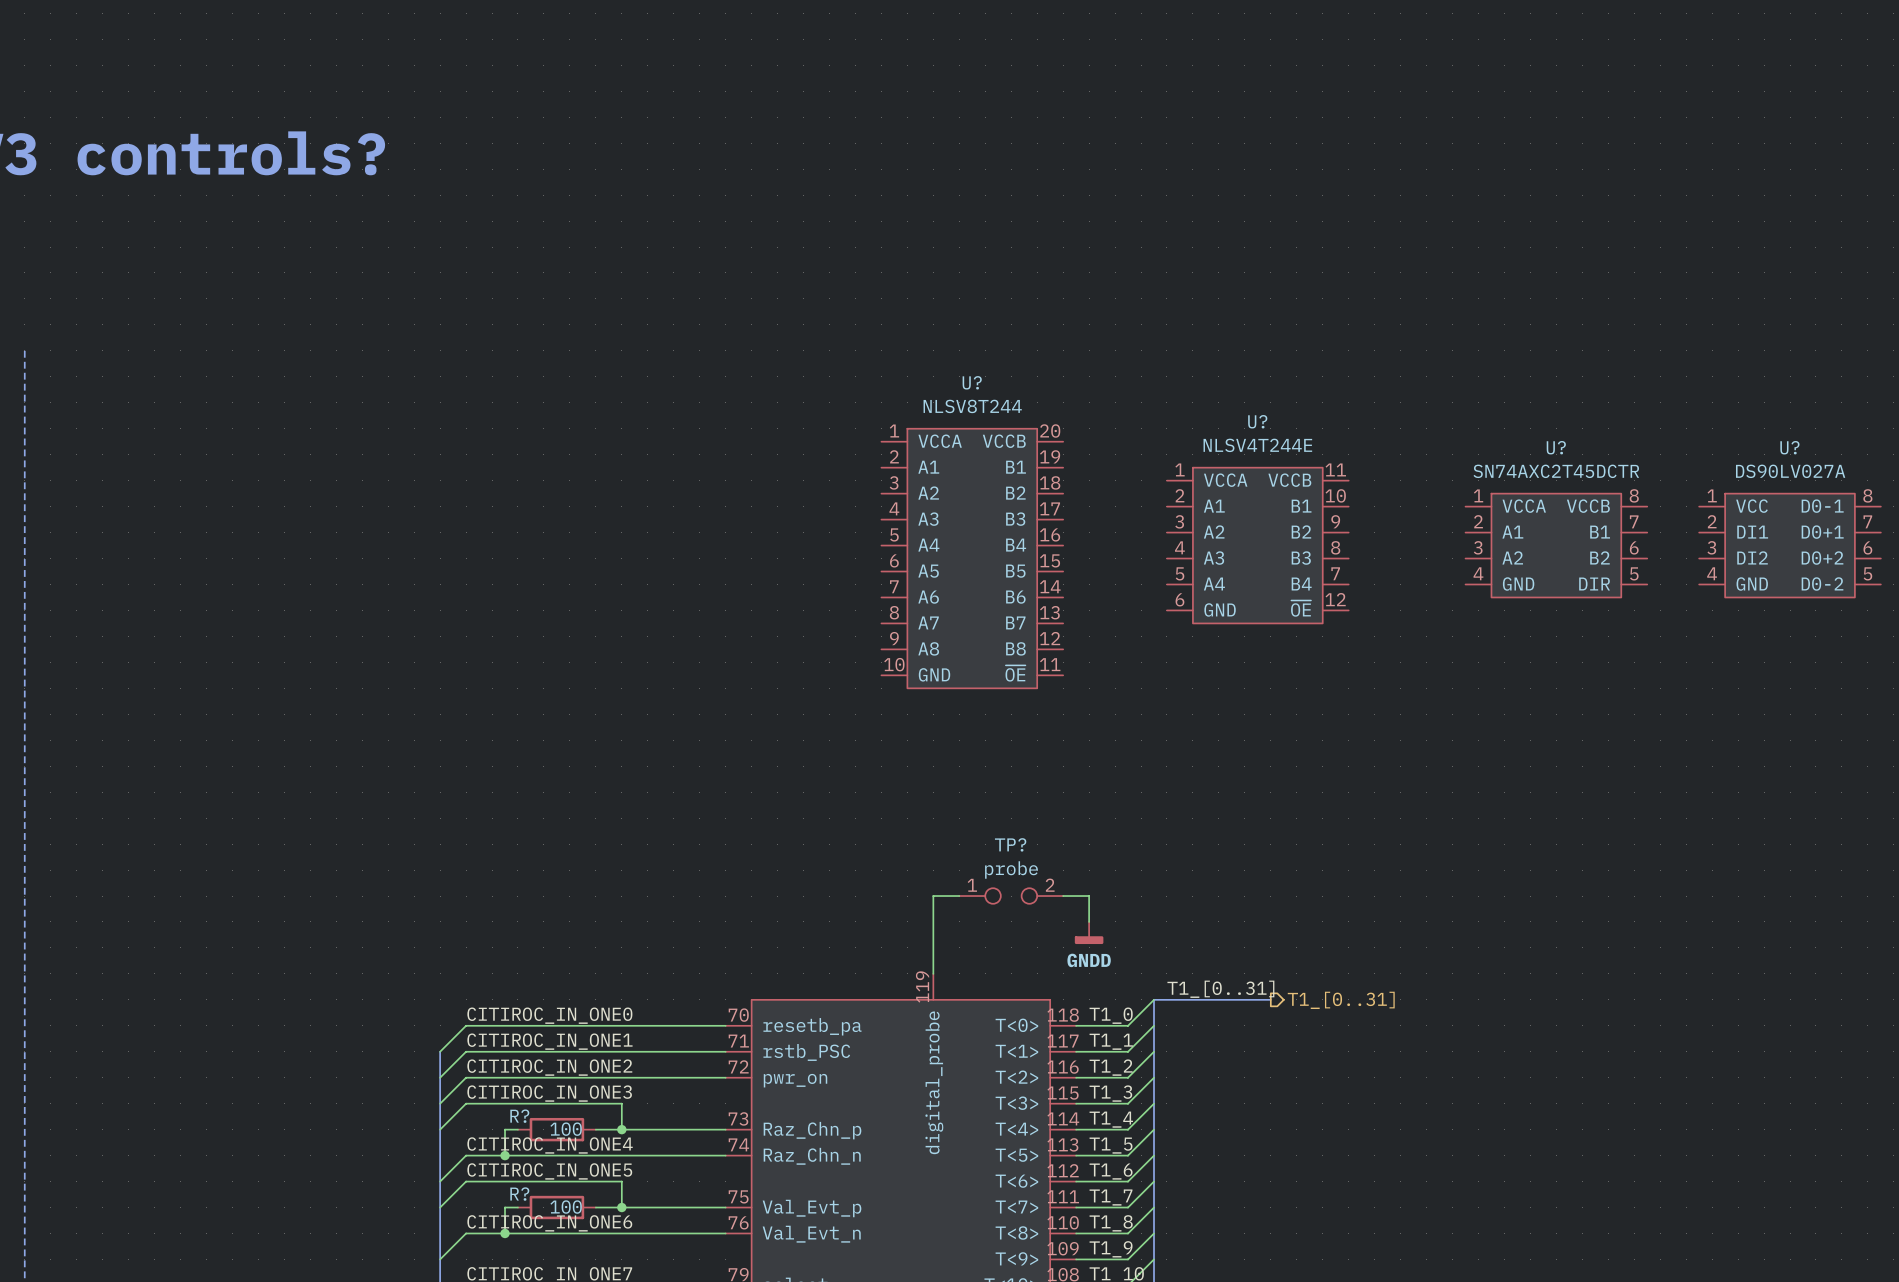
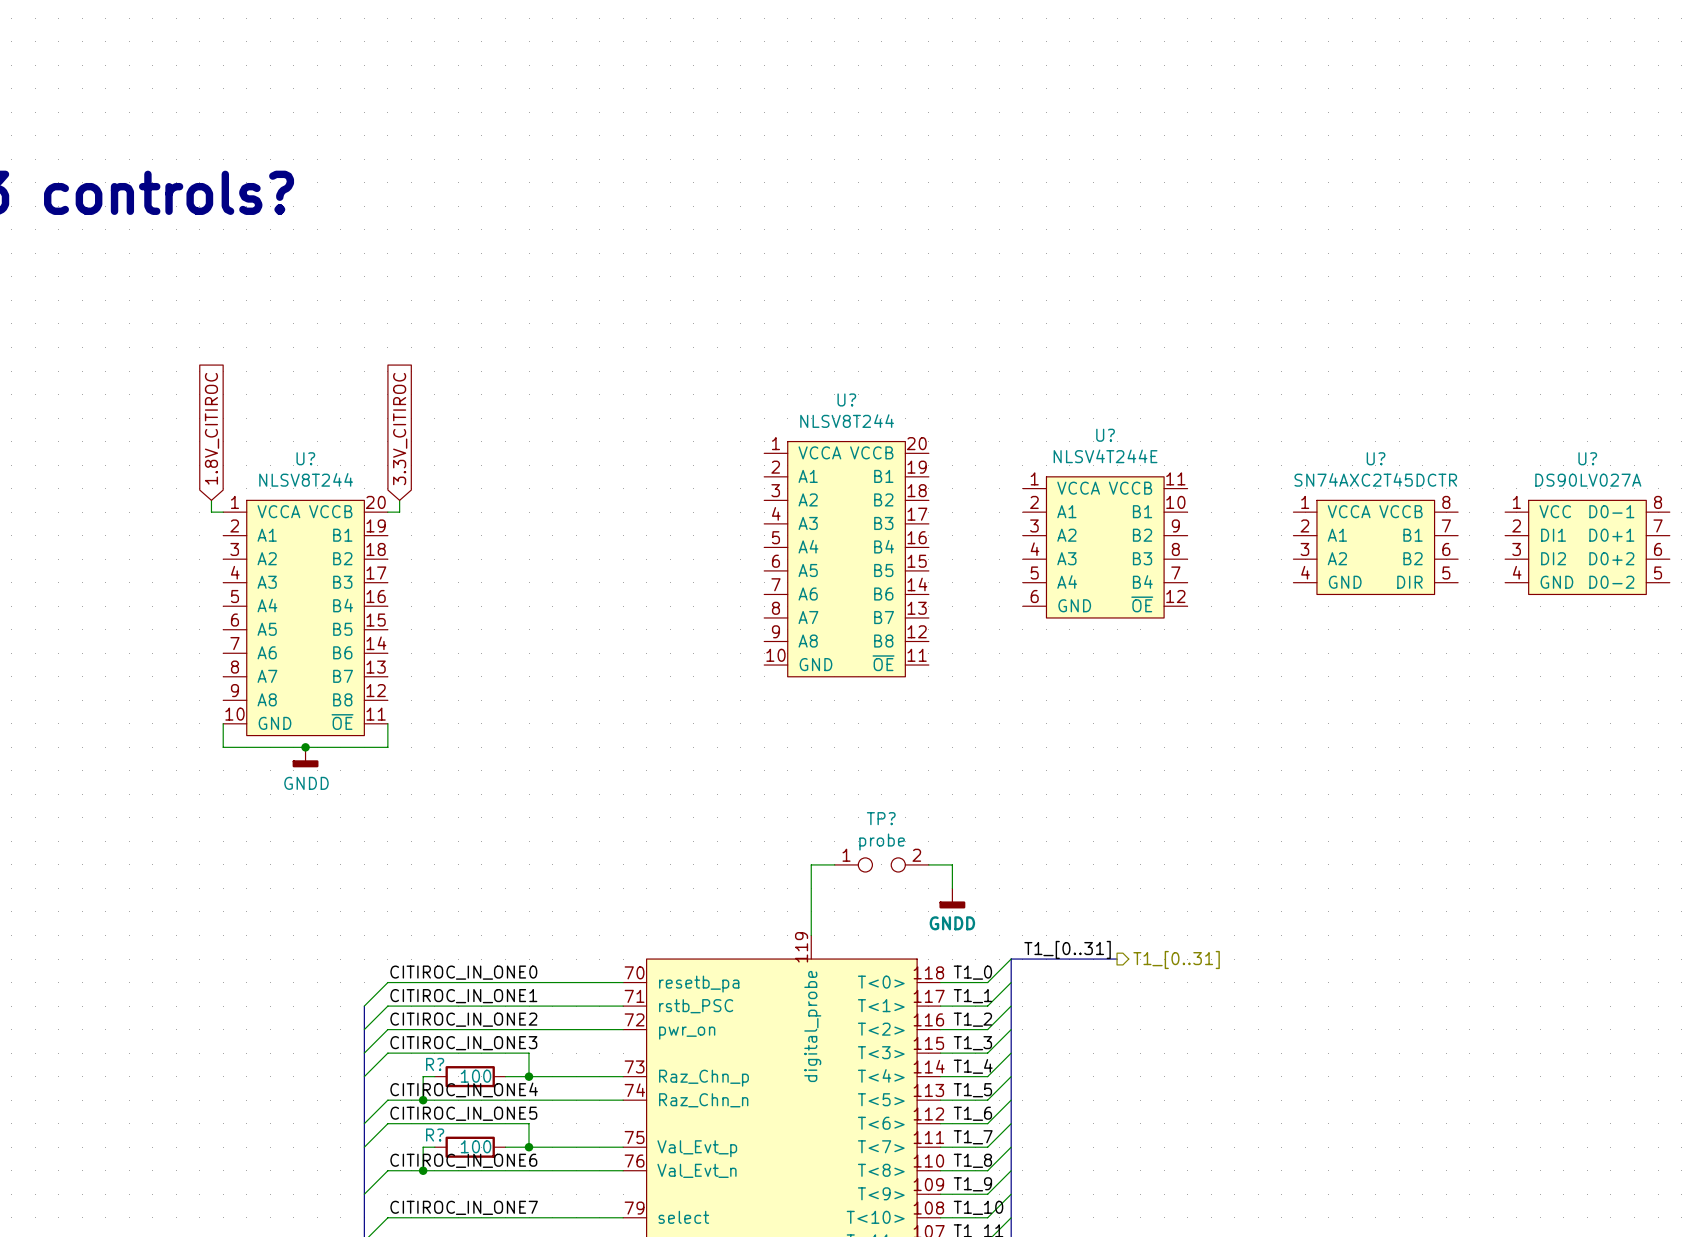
global label: none -> 1.8V_CITIROC (212, 428)
global label: none -> 3.3V_CITIROC (400, 429)
wire: none -> (211, 500) (211, 512) (223, 512)
wire: none -> (399, 500) (399, 512) (387, 512)
U?: none -> NLSV8T244 (305, 617)
wire: none -> (223, 723) (223, 747) (387, 747) (387, 723)
junction: none -> (305, 747)
power symbol: none -> GNDD (305, 757)

